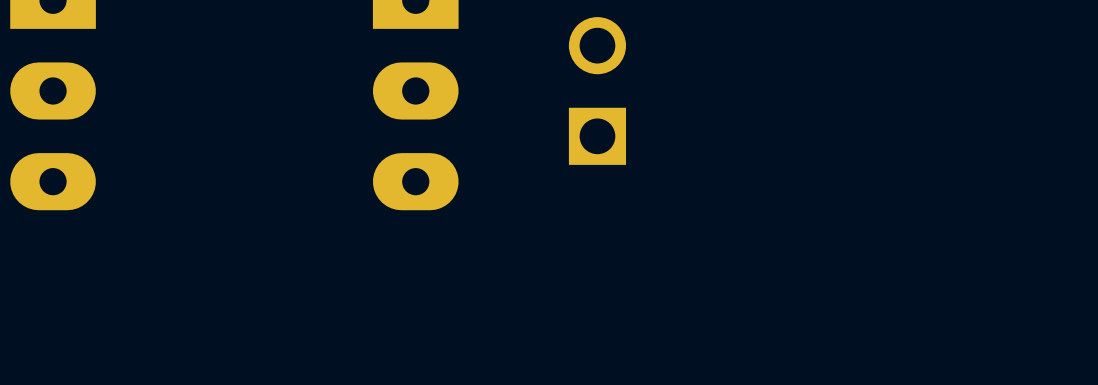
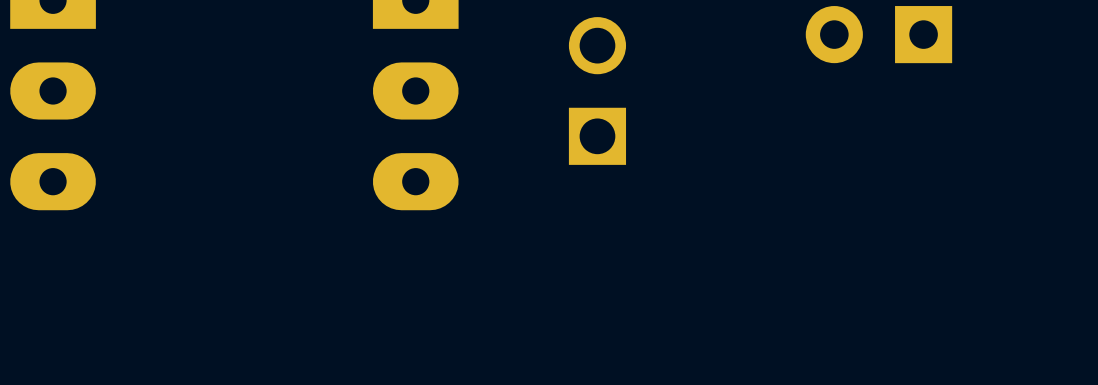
part: none -> (878, 34)

